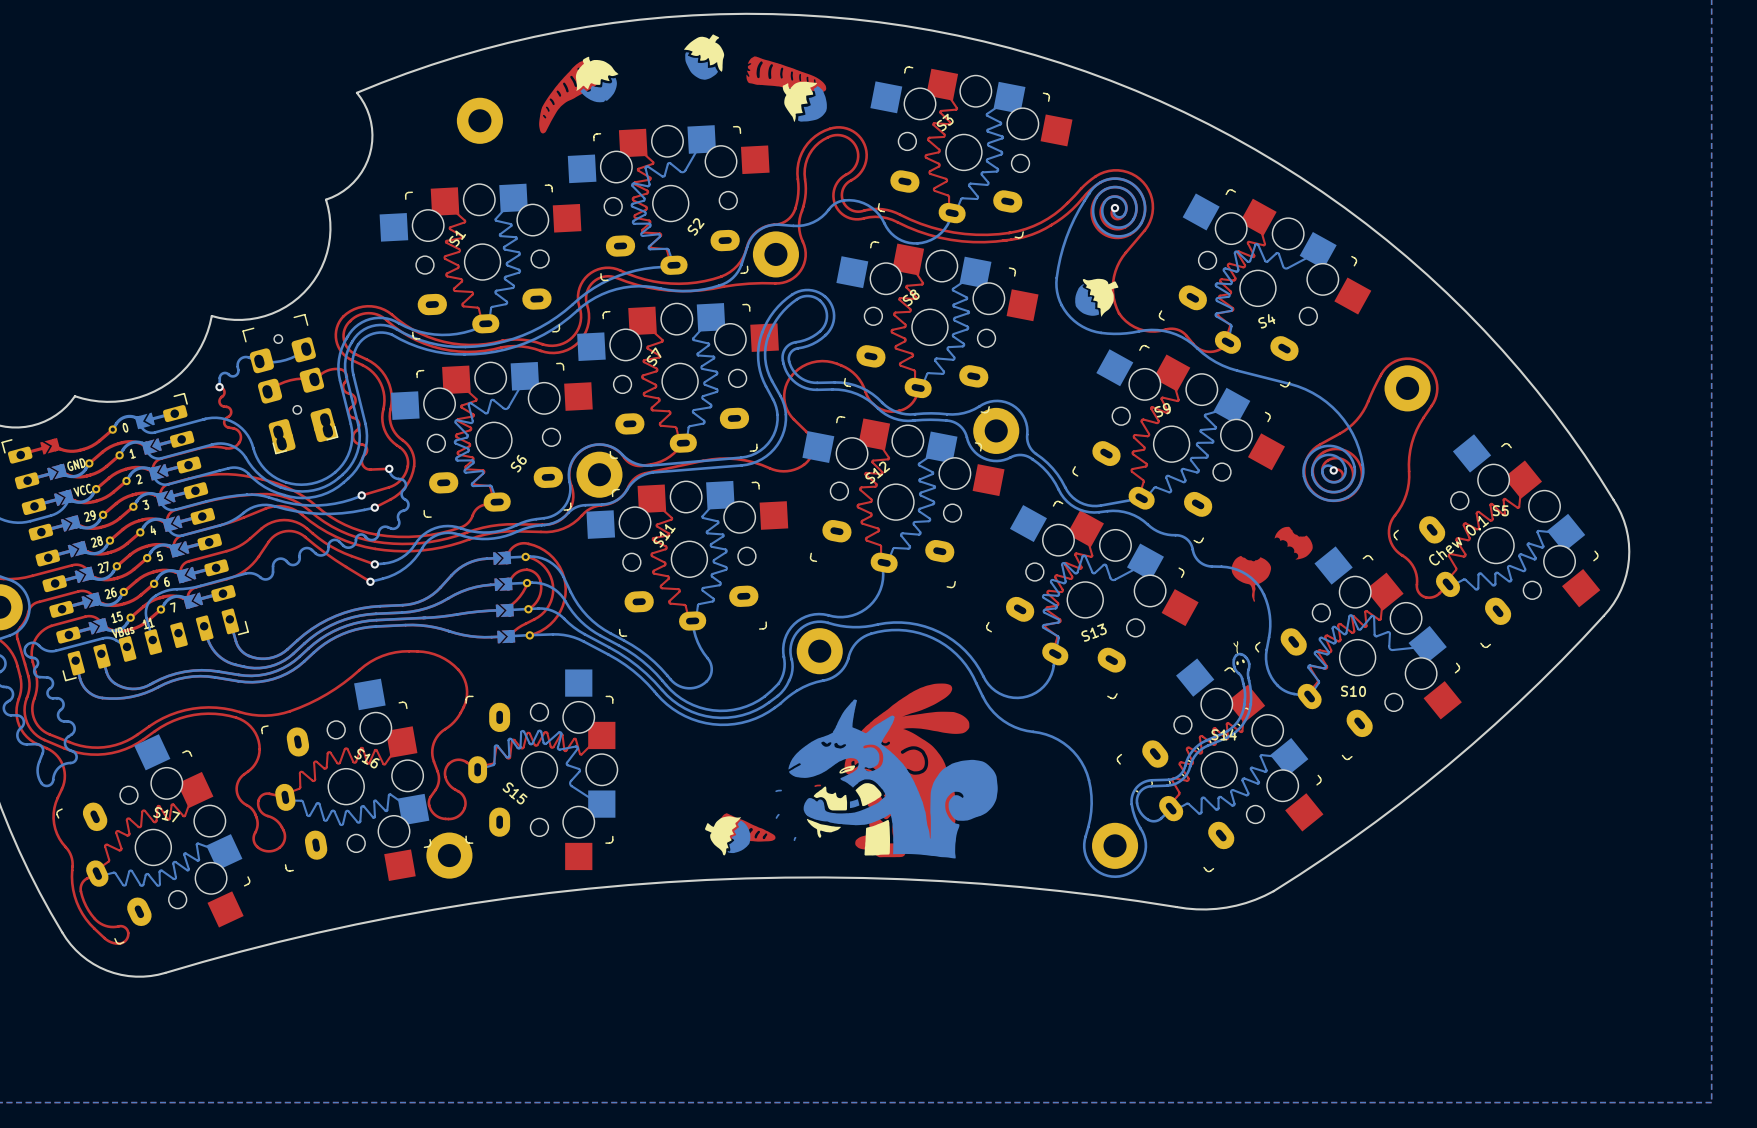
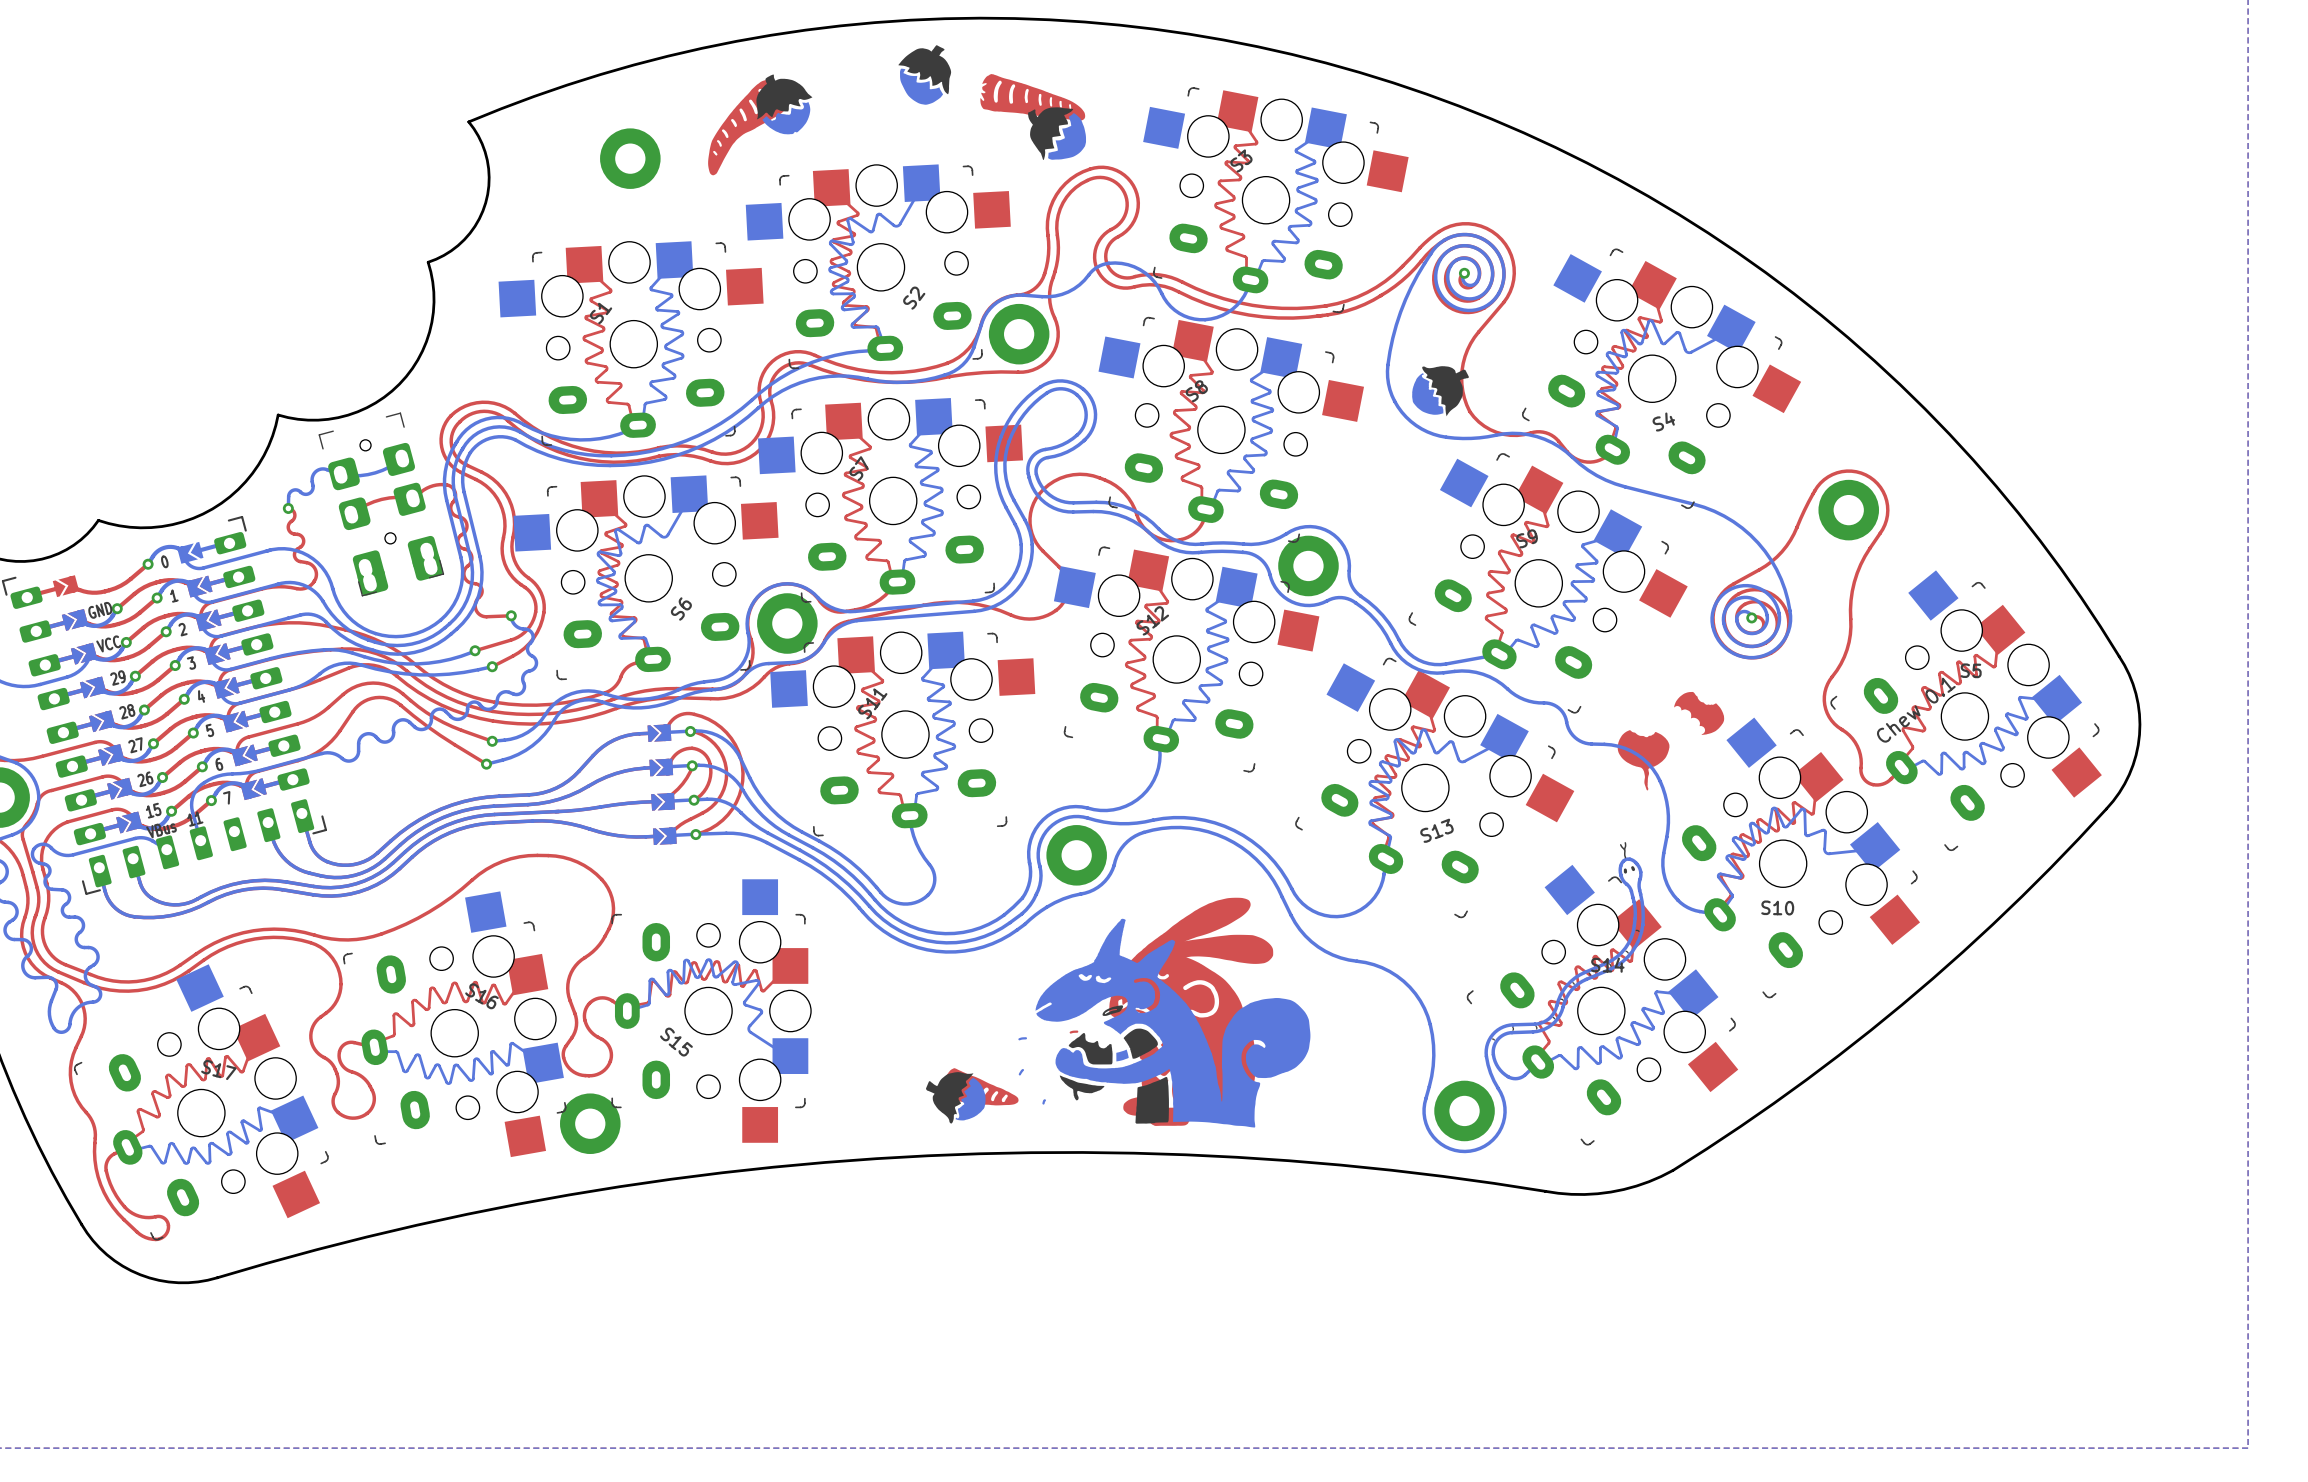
S10 footprint: [1255, 546, 1462, 761] -> [1681, 717, 1921, 999]

